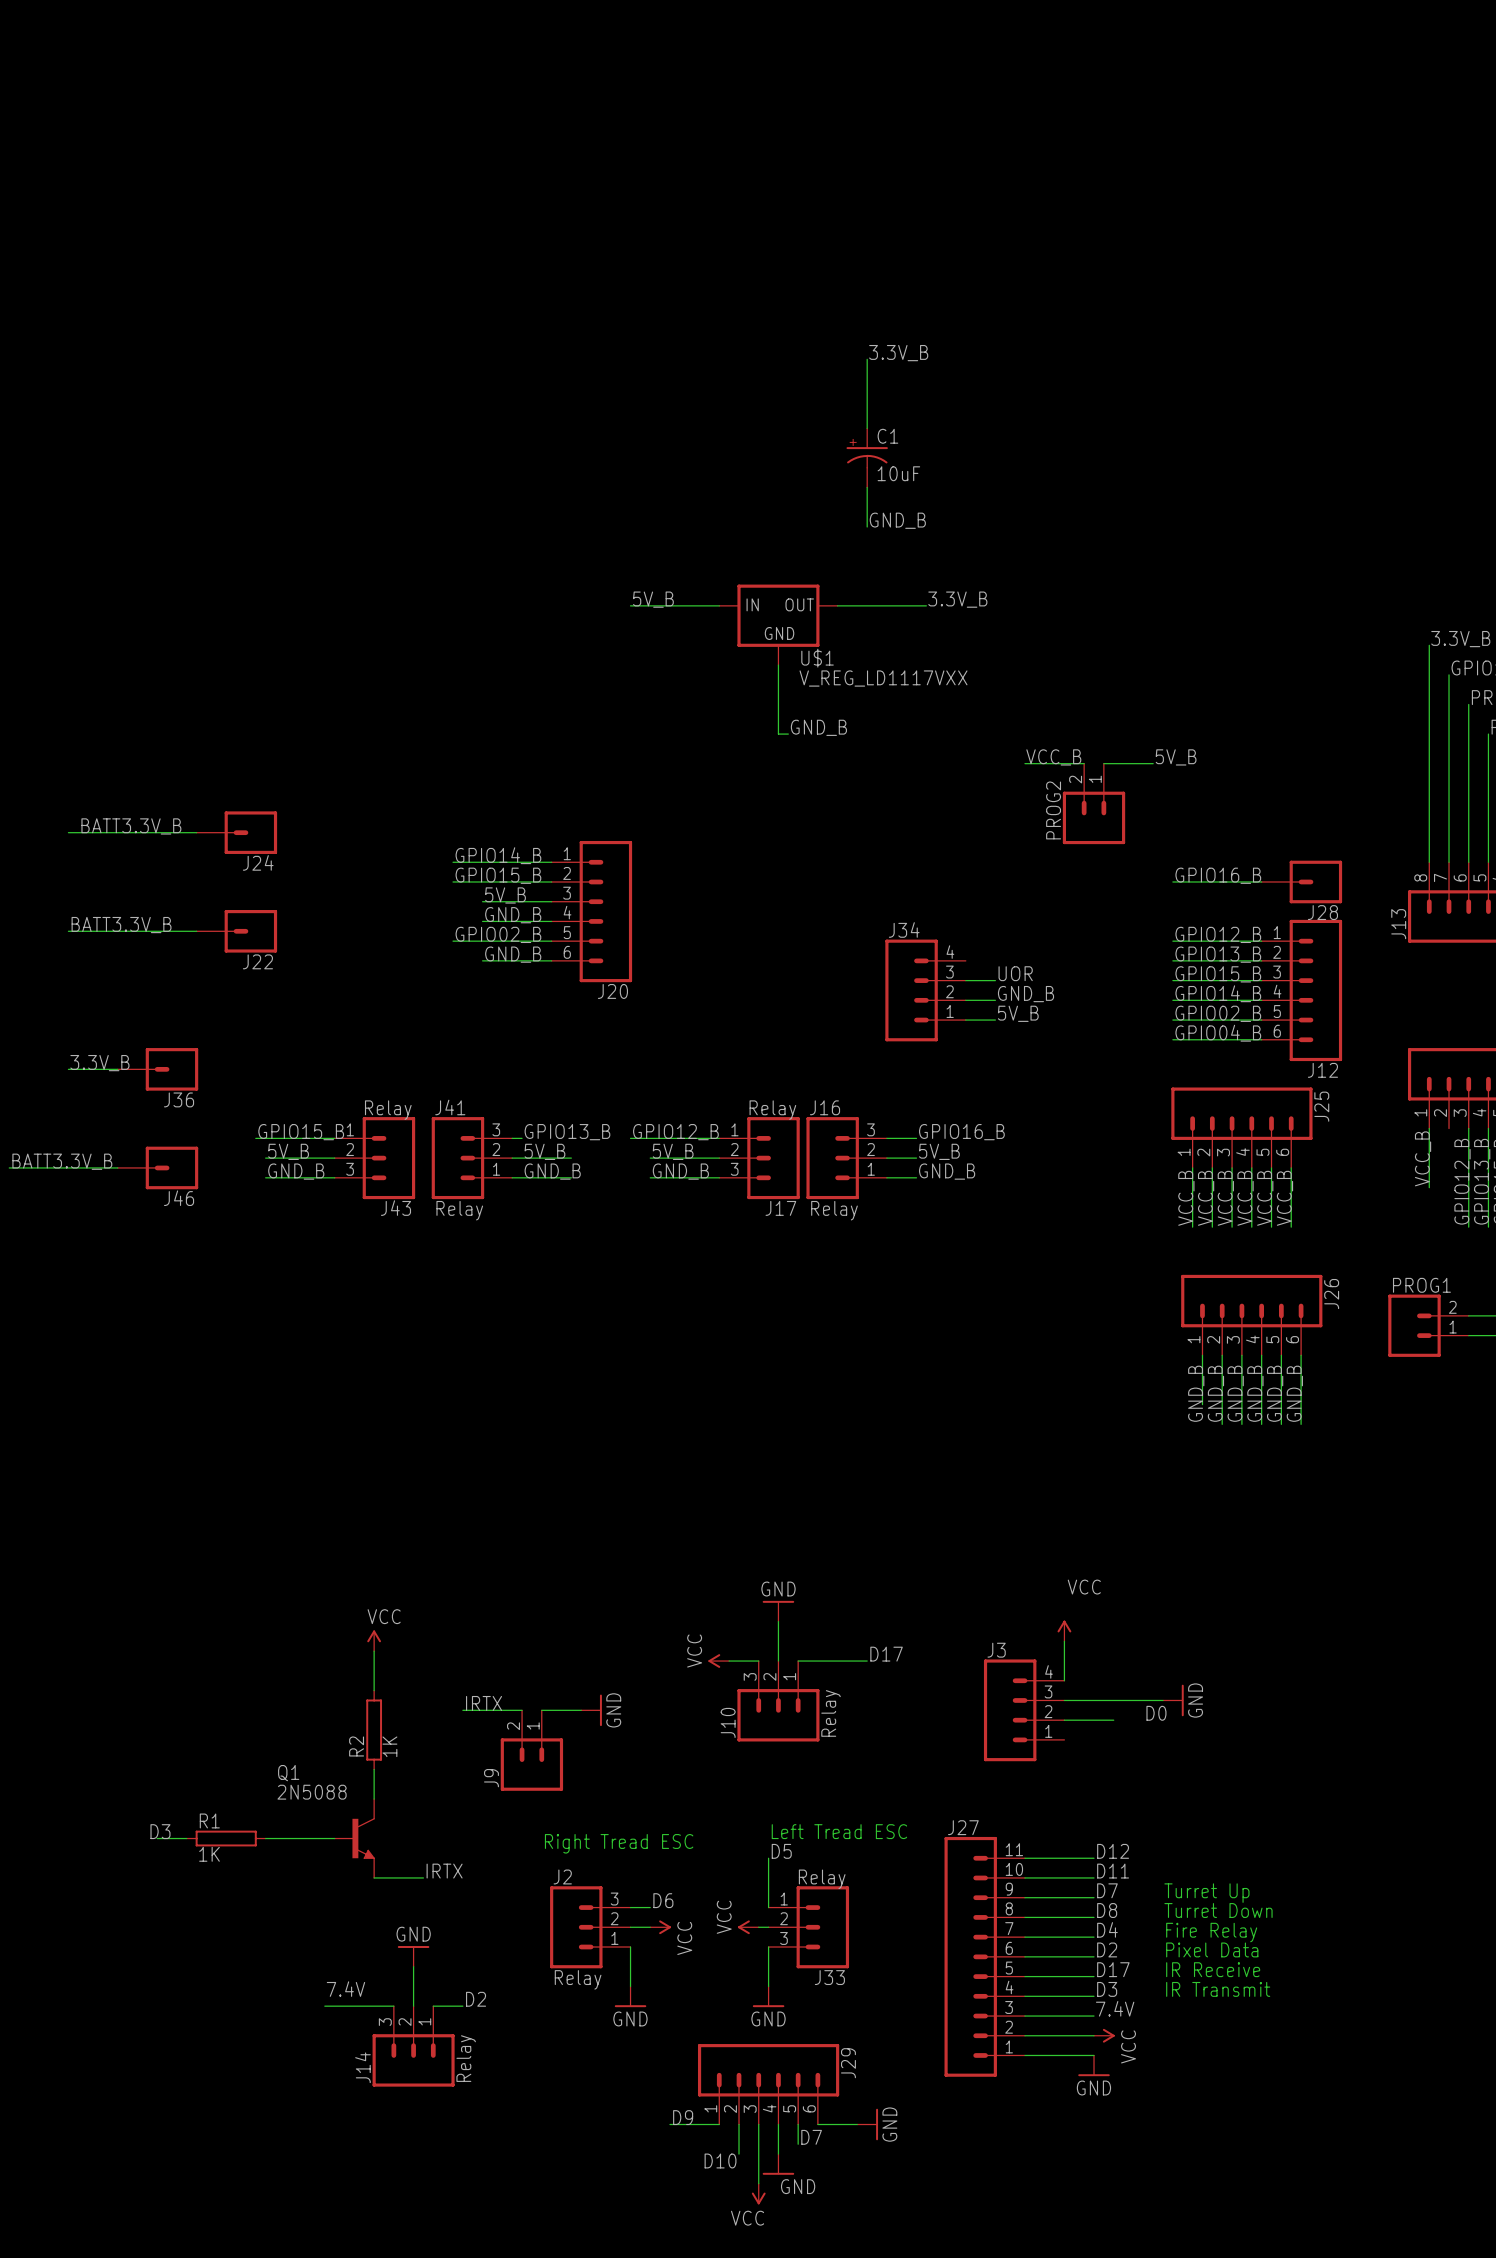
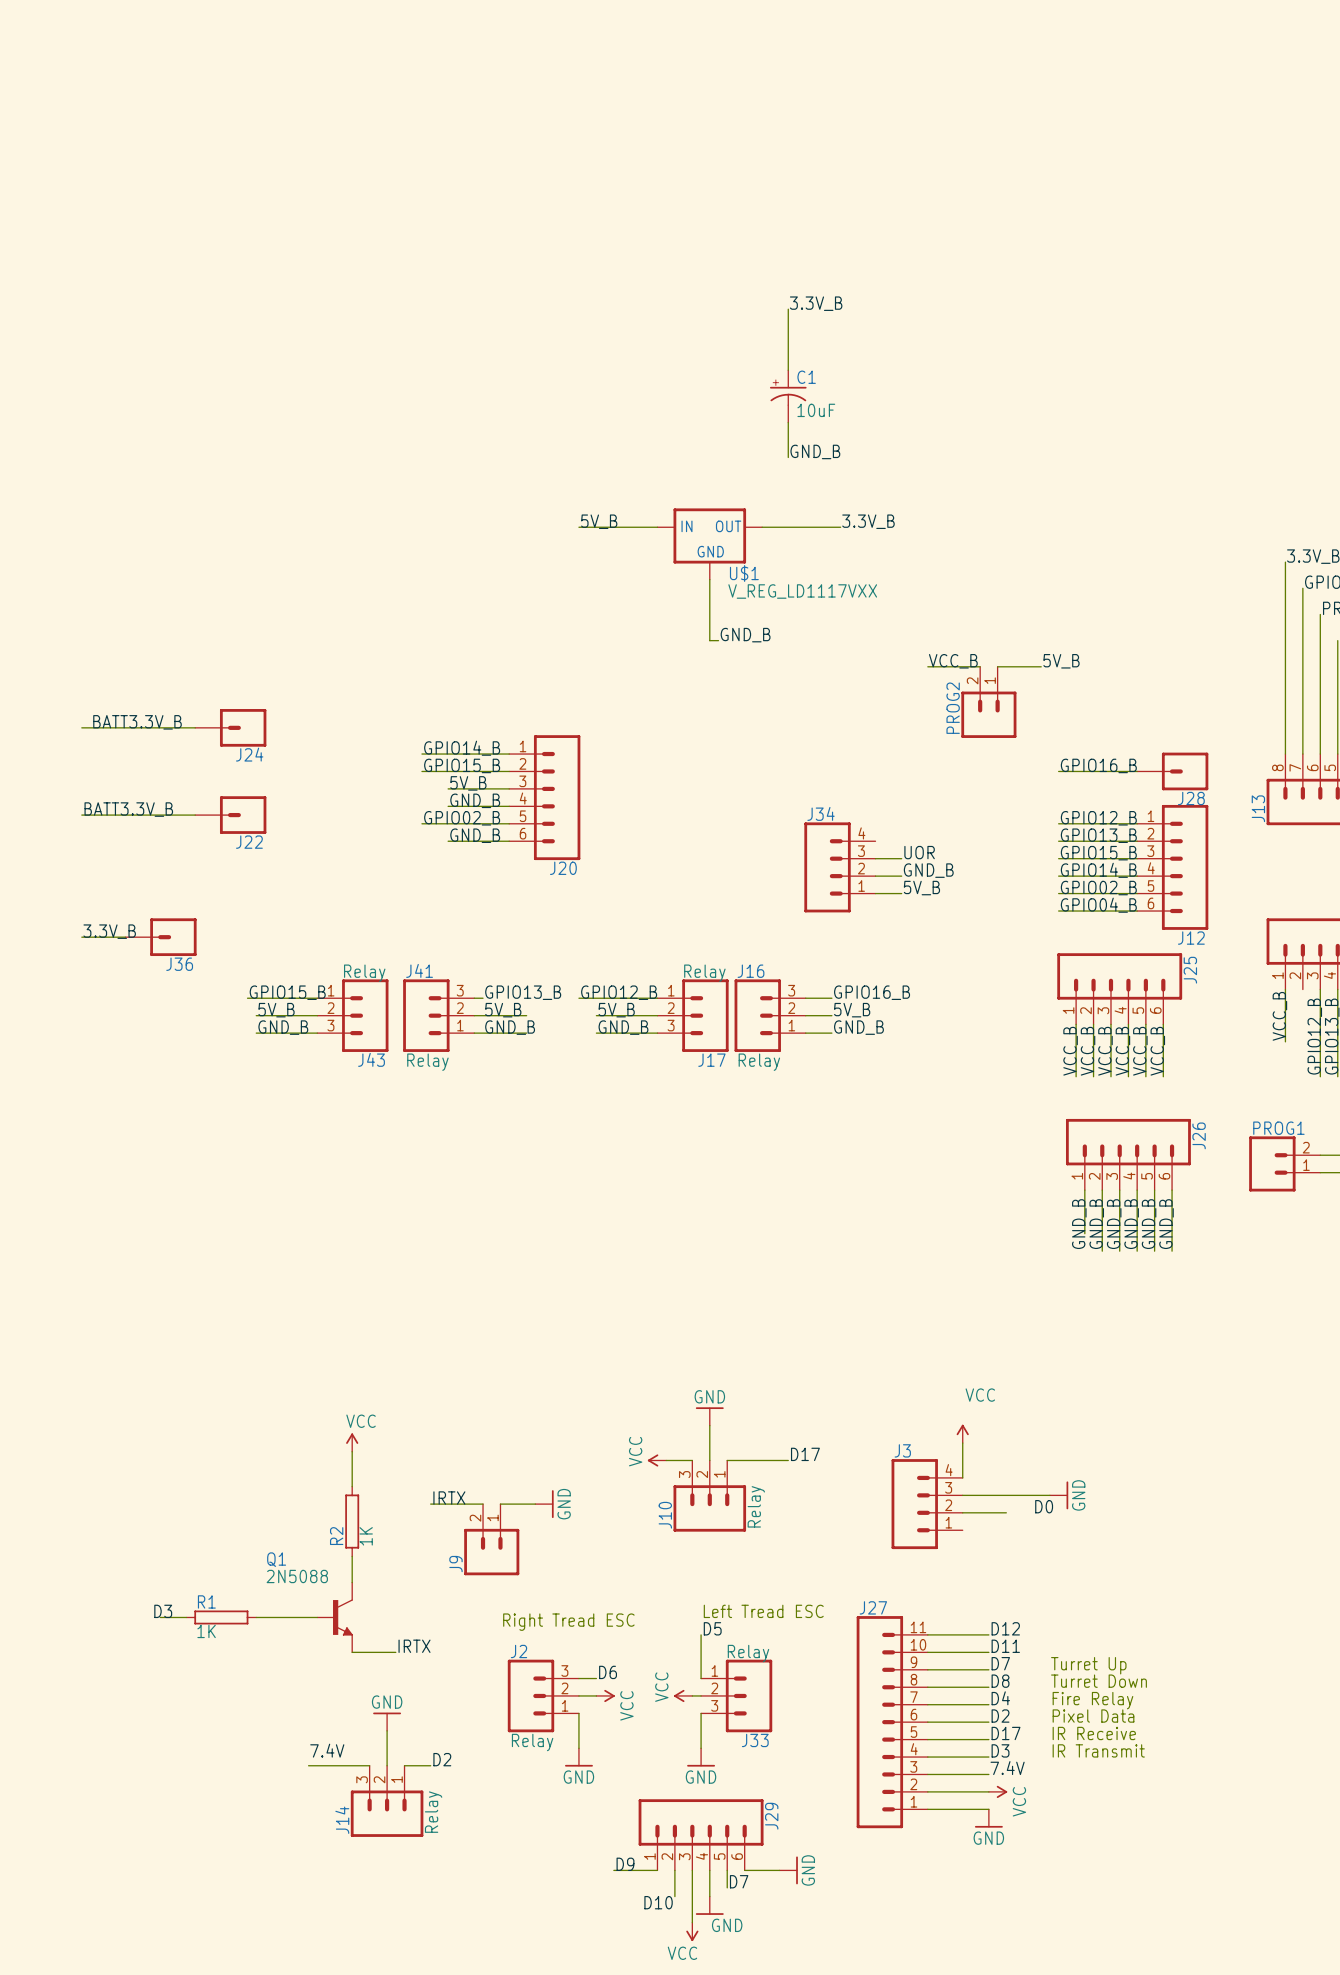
label: BATT3.3V_B (62, 1161) -> none
wire: (9, 1167) (117, 1167) -> none
J46: (157, 1167) -> none

